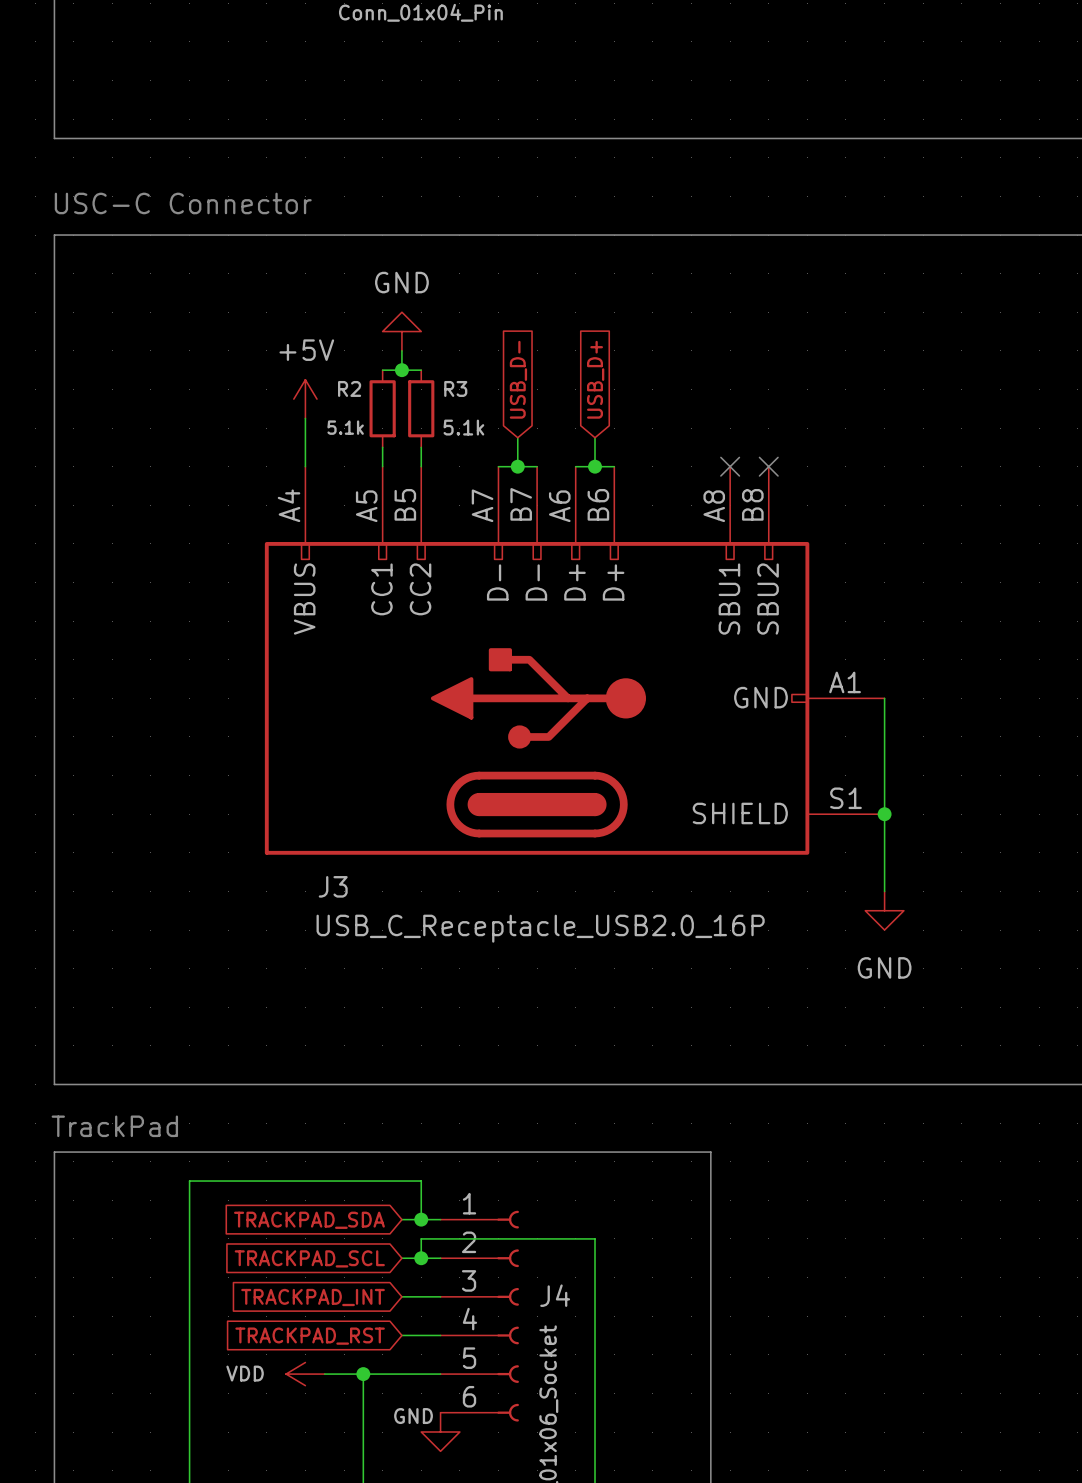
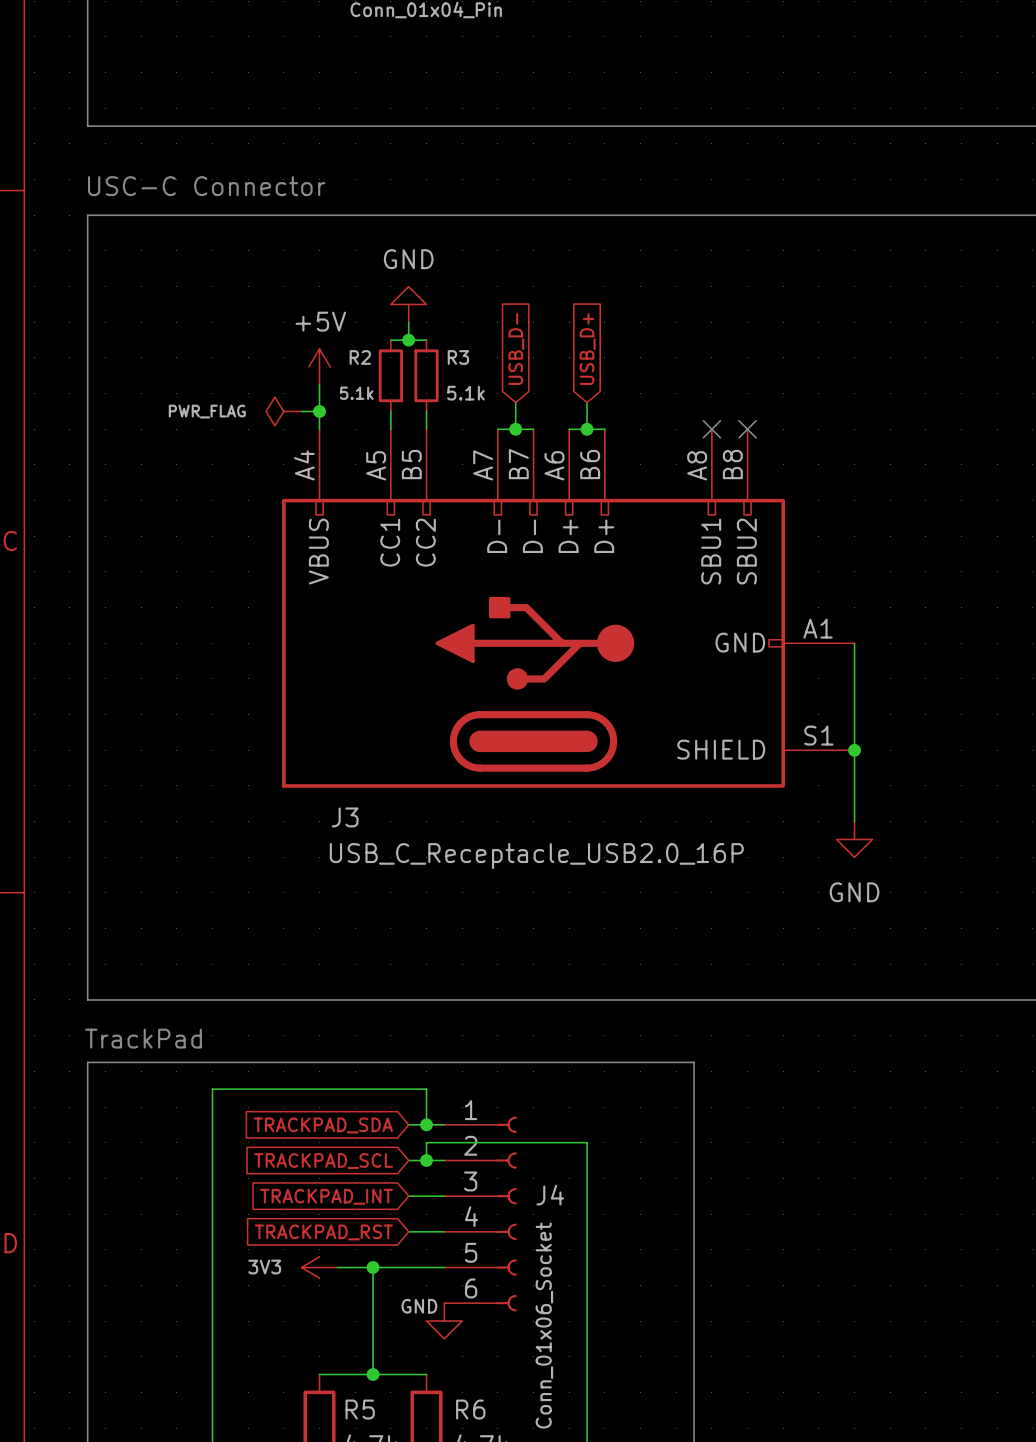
power symbol: none -> PWR_FLAG (283, 411)
wire: none -> (301, 411) (319, 411)
junction: none -> (319, 411)
power symbol: VDD (305, 1374) -> 3V3 (319, 1267)

